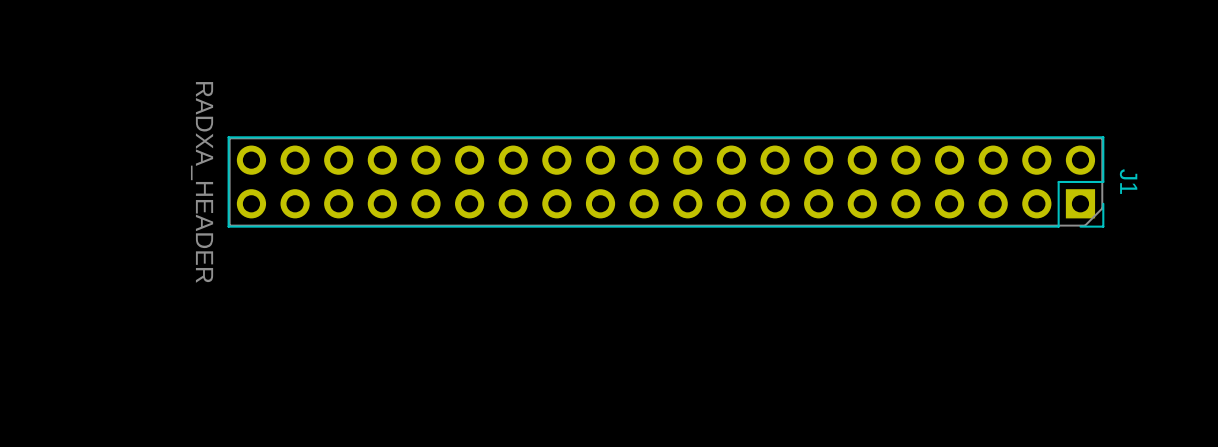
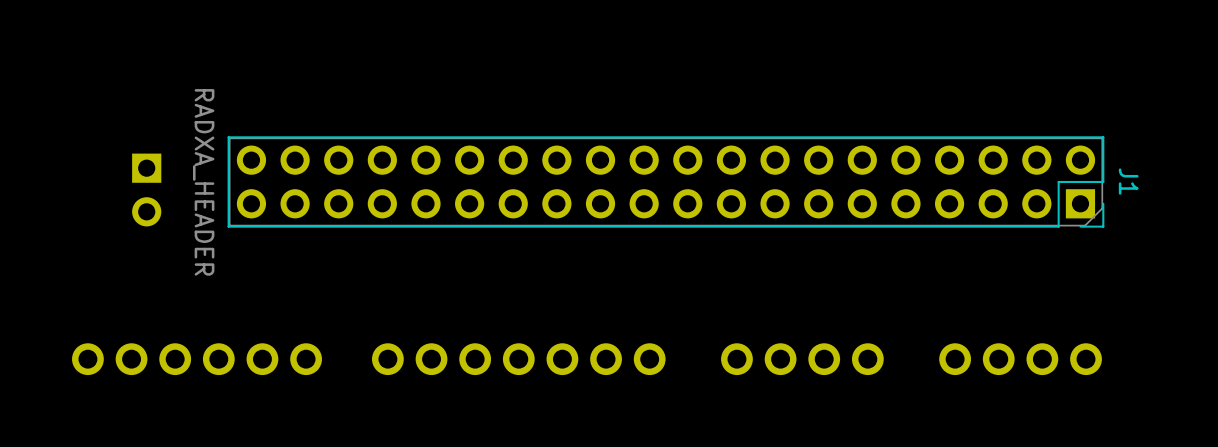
part: none -> (146, 190)
part: none -> (197, 359)
part: none -> (518, 359)
part: none -> (802, 359)
part: none -> (1020, 359)

